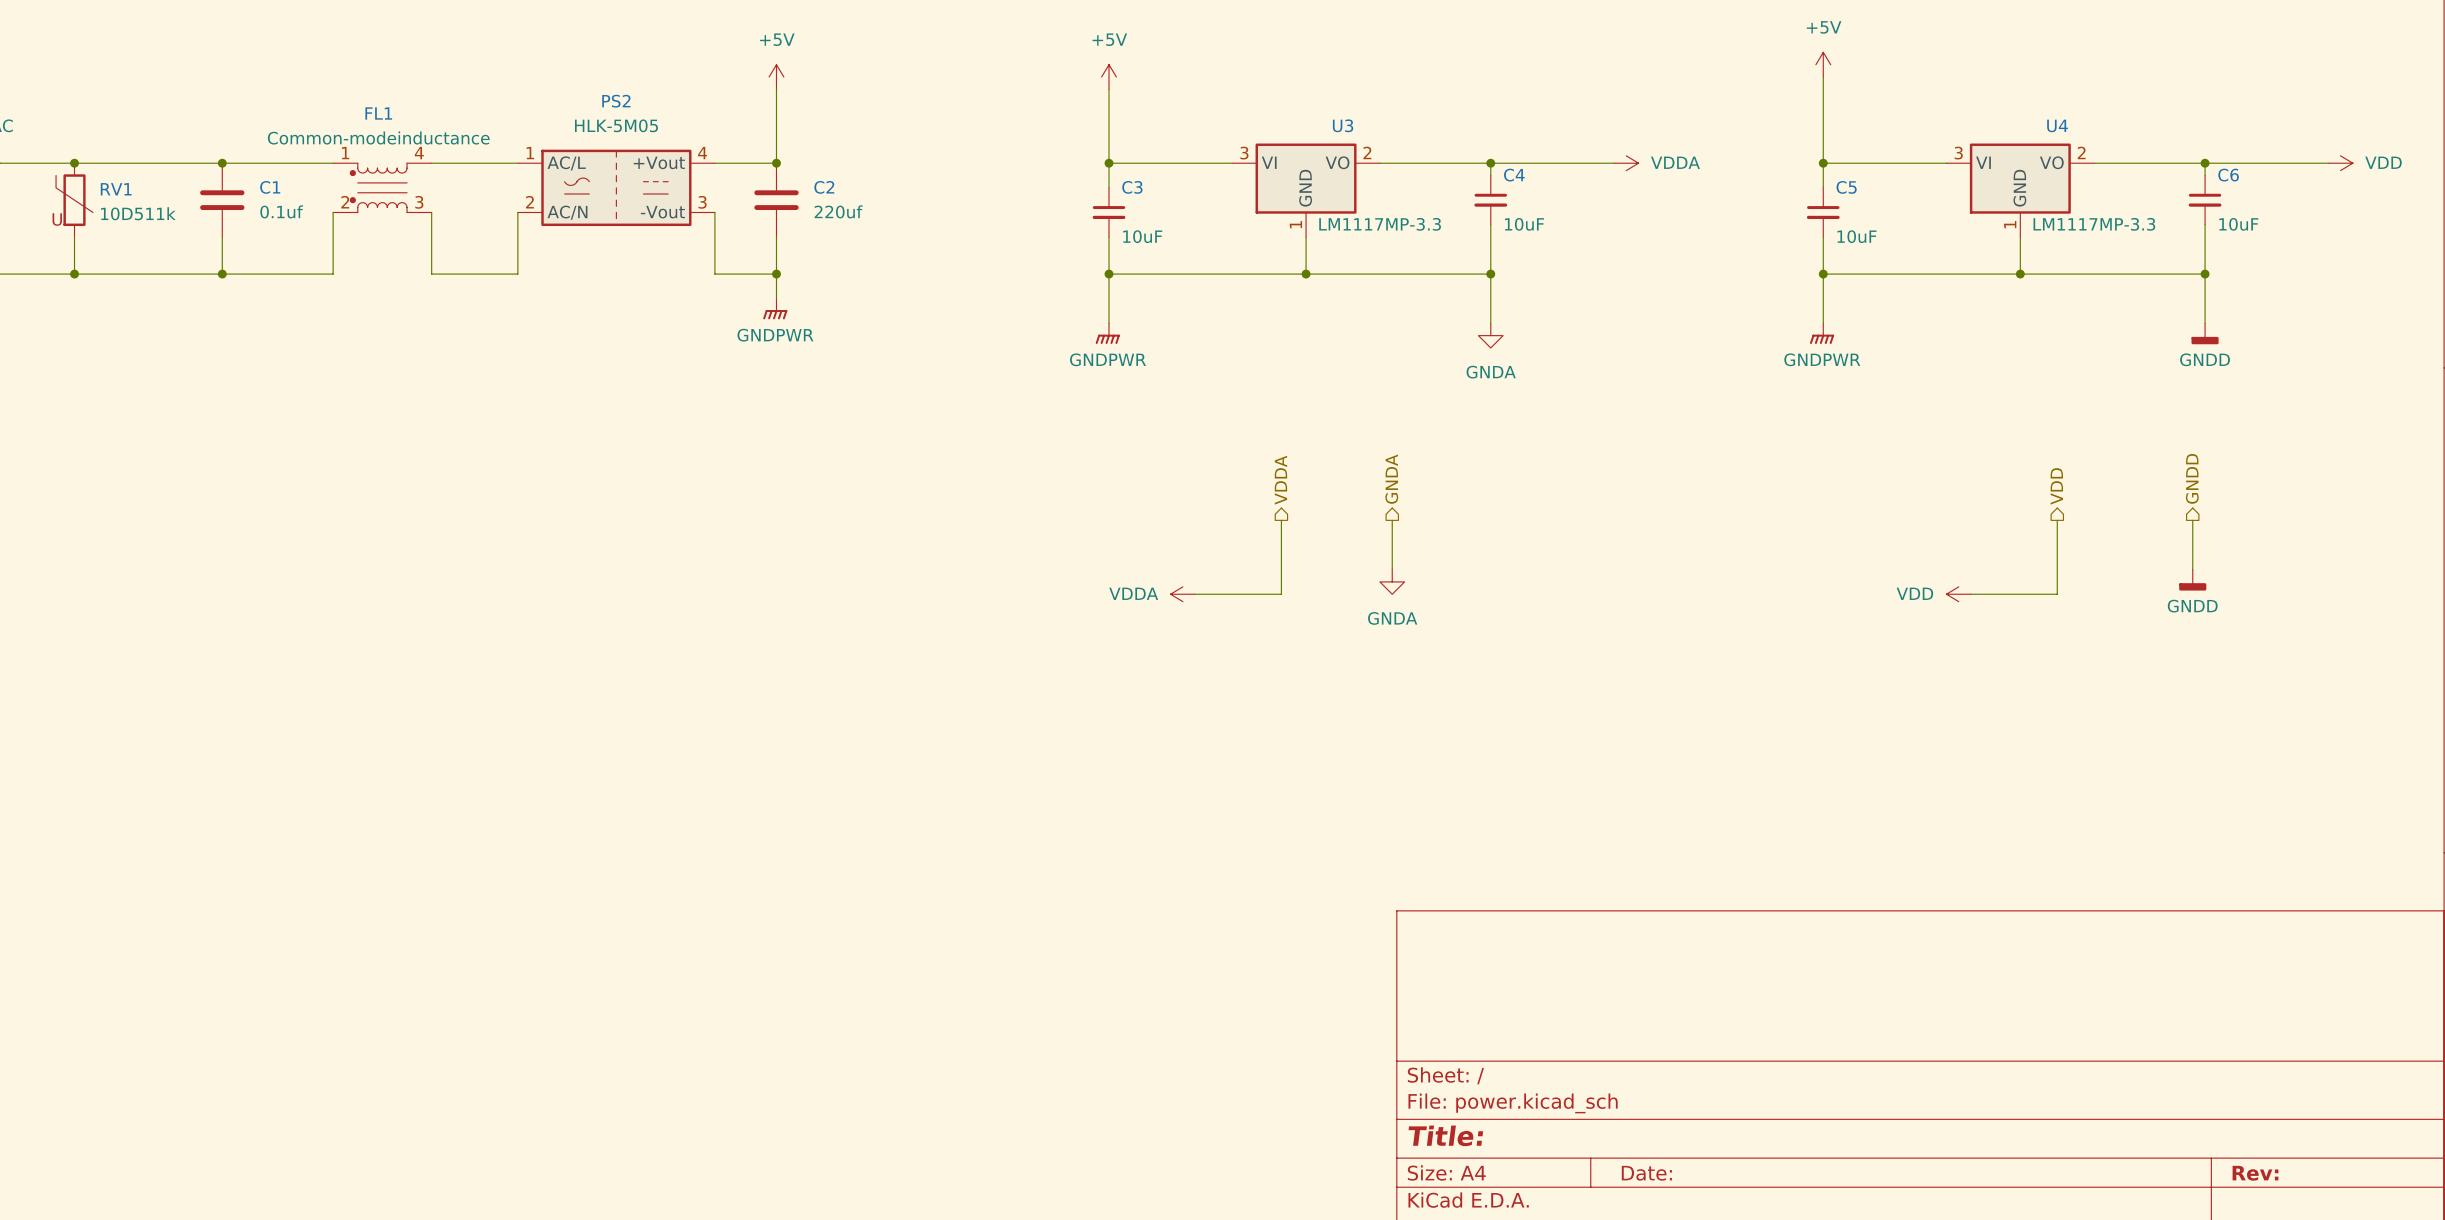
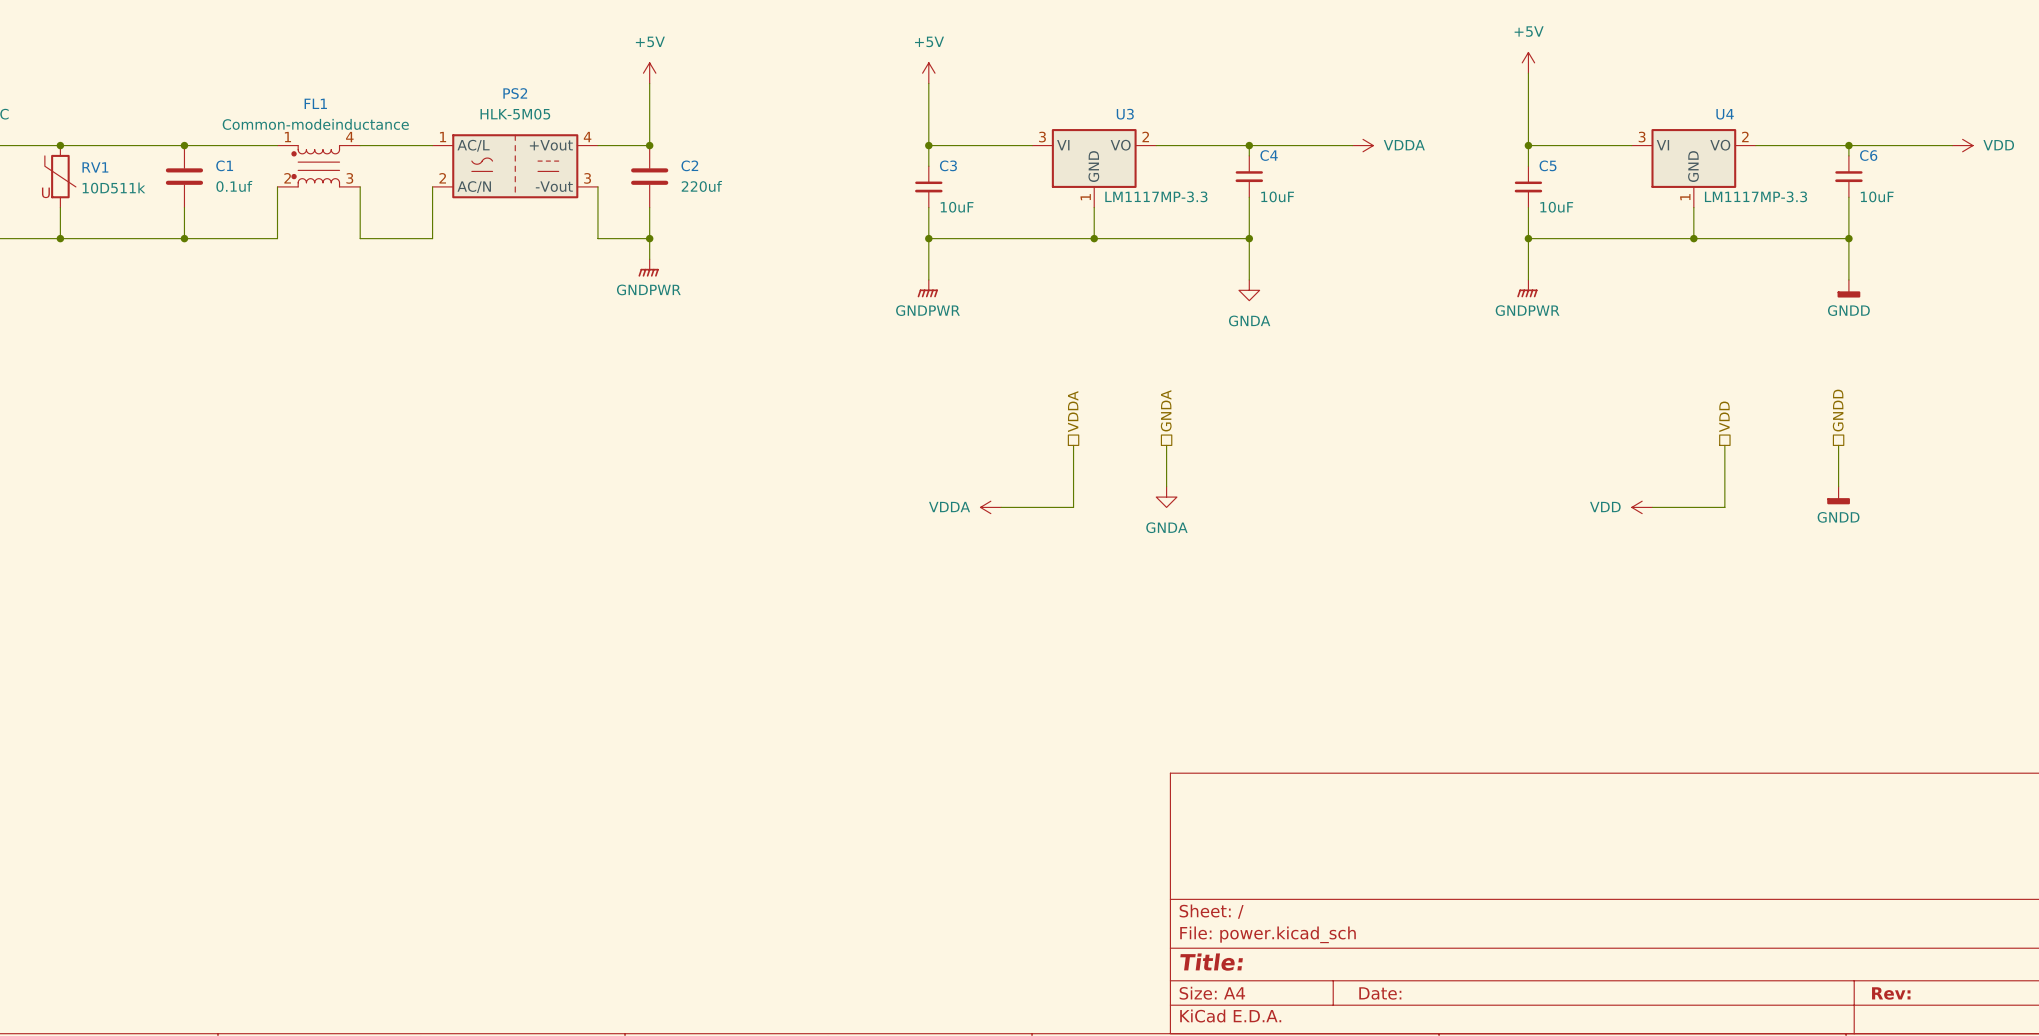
hierarchical label shape: output (2192, 478) -> passive (1838, 410)
hierarchical label shape: output (1391, 479) -> passive (1166, 410)
hierarchical label shape: output (1280, 480) -> passive (1073, 411)
hierarchical label shape: output (2056, 486) -> passive (1724, 416)

